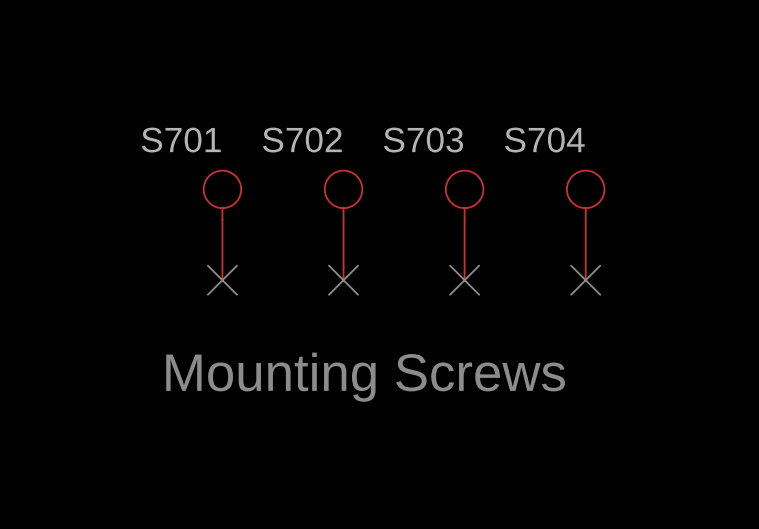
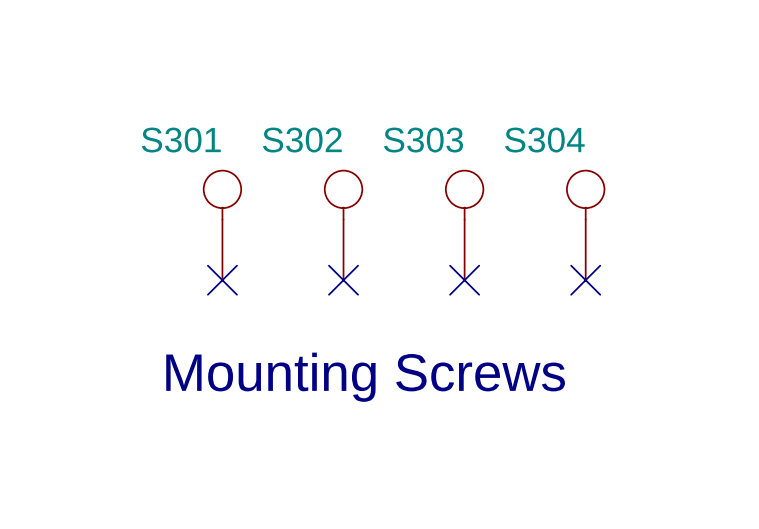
S701 name: S701 (181, 140) -> S301 (181, 140)
S702 name: S702 (302, 140) -> S302 (302, 140)
S703 name: S703 (423, 140) -> S303 (423, 140)
S704 name: S704 (544, 140) -> S304 (544, 140)

